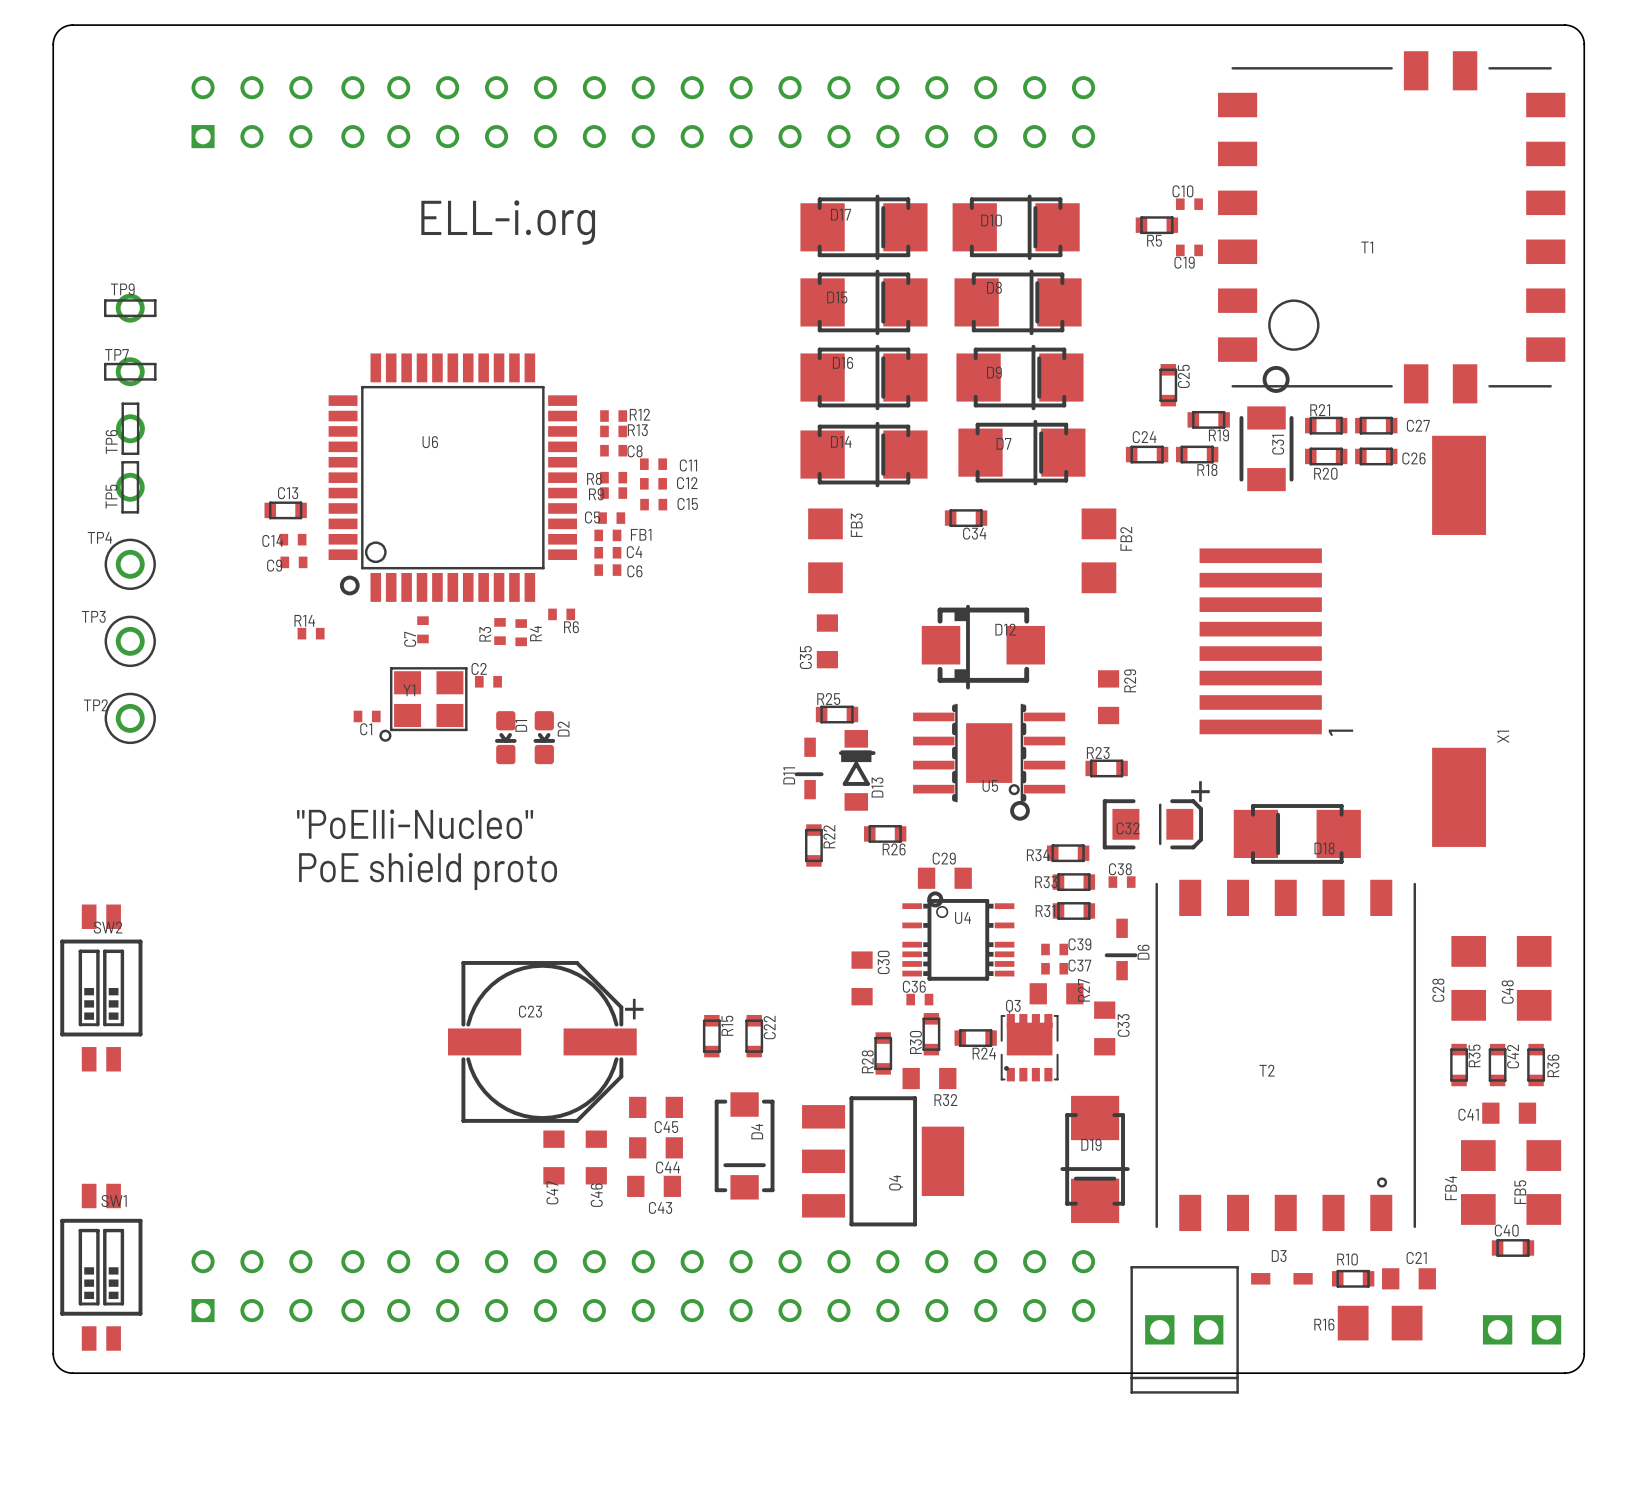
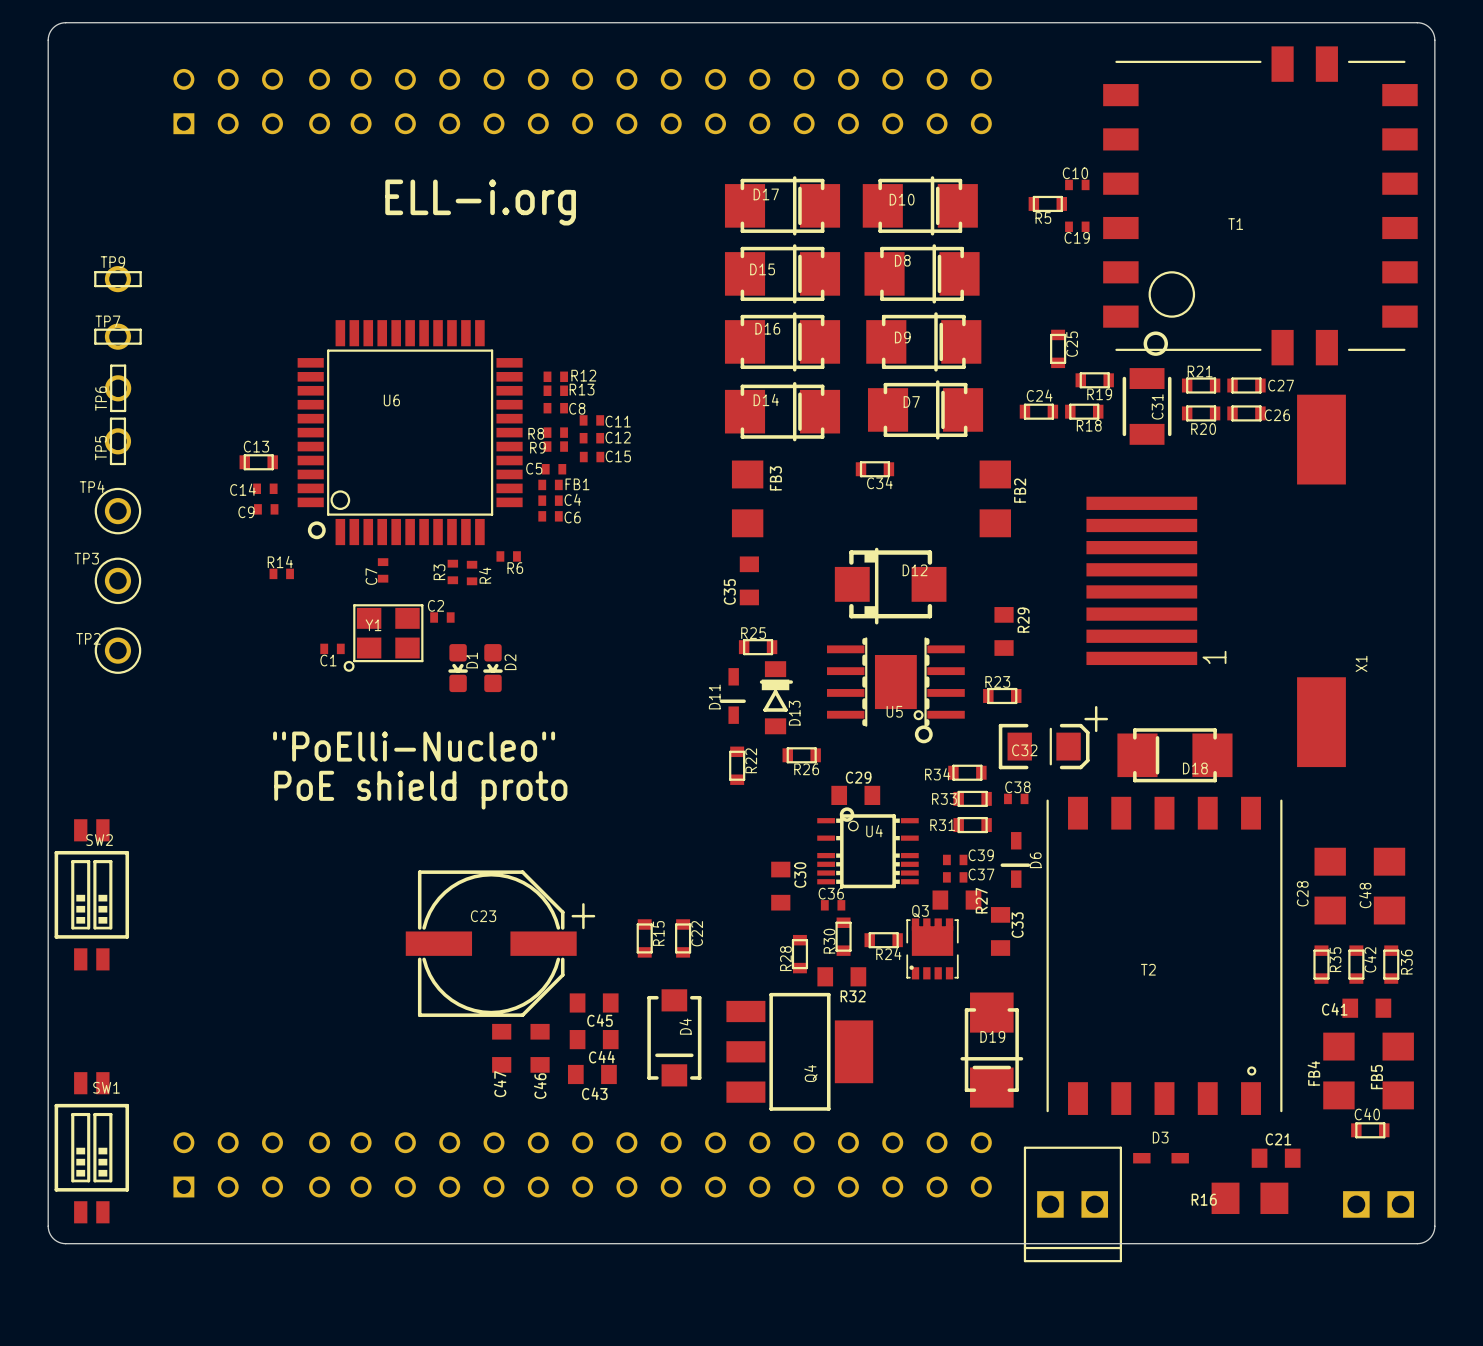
R10: (1353, 1278) -> none

